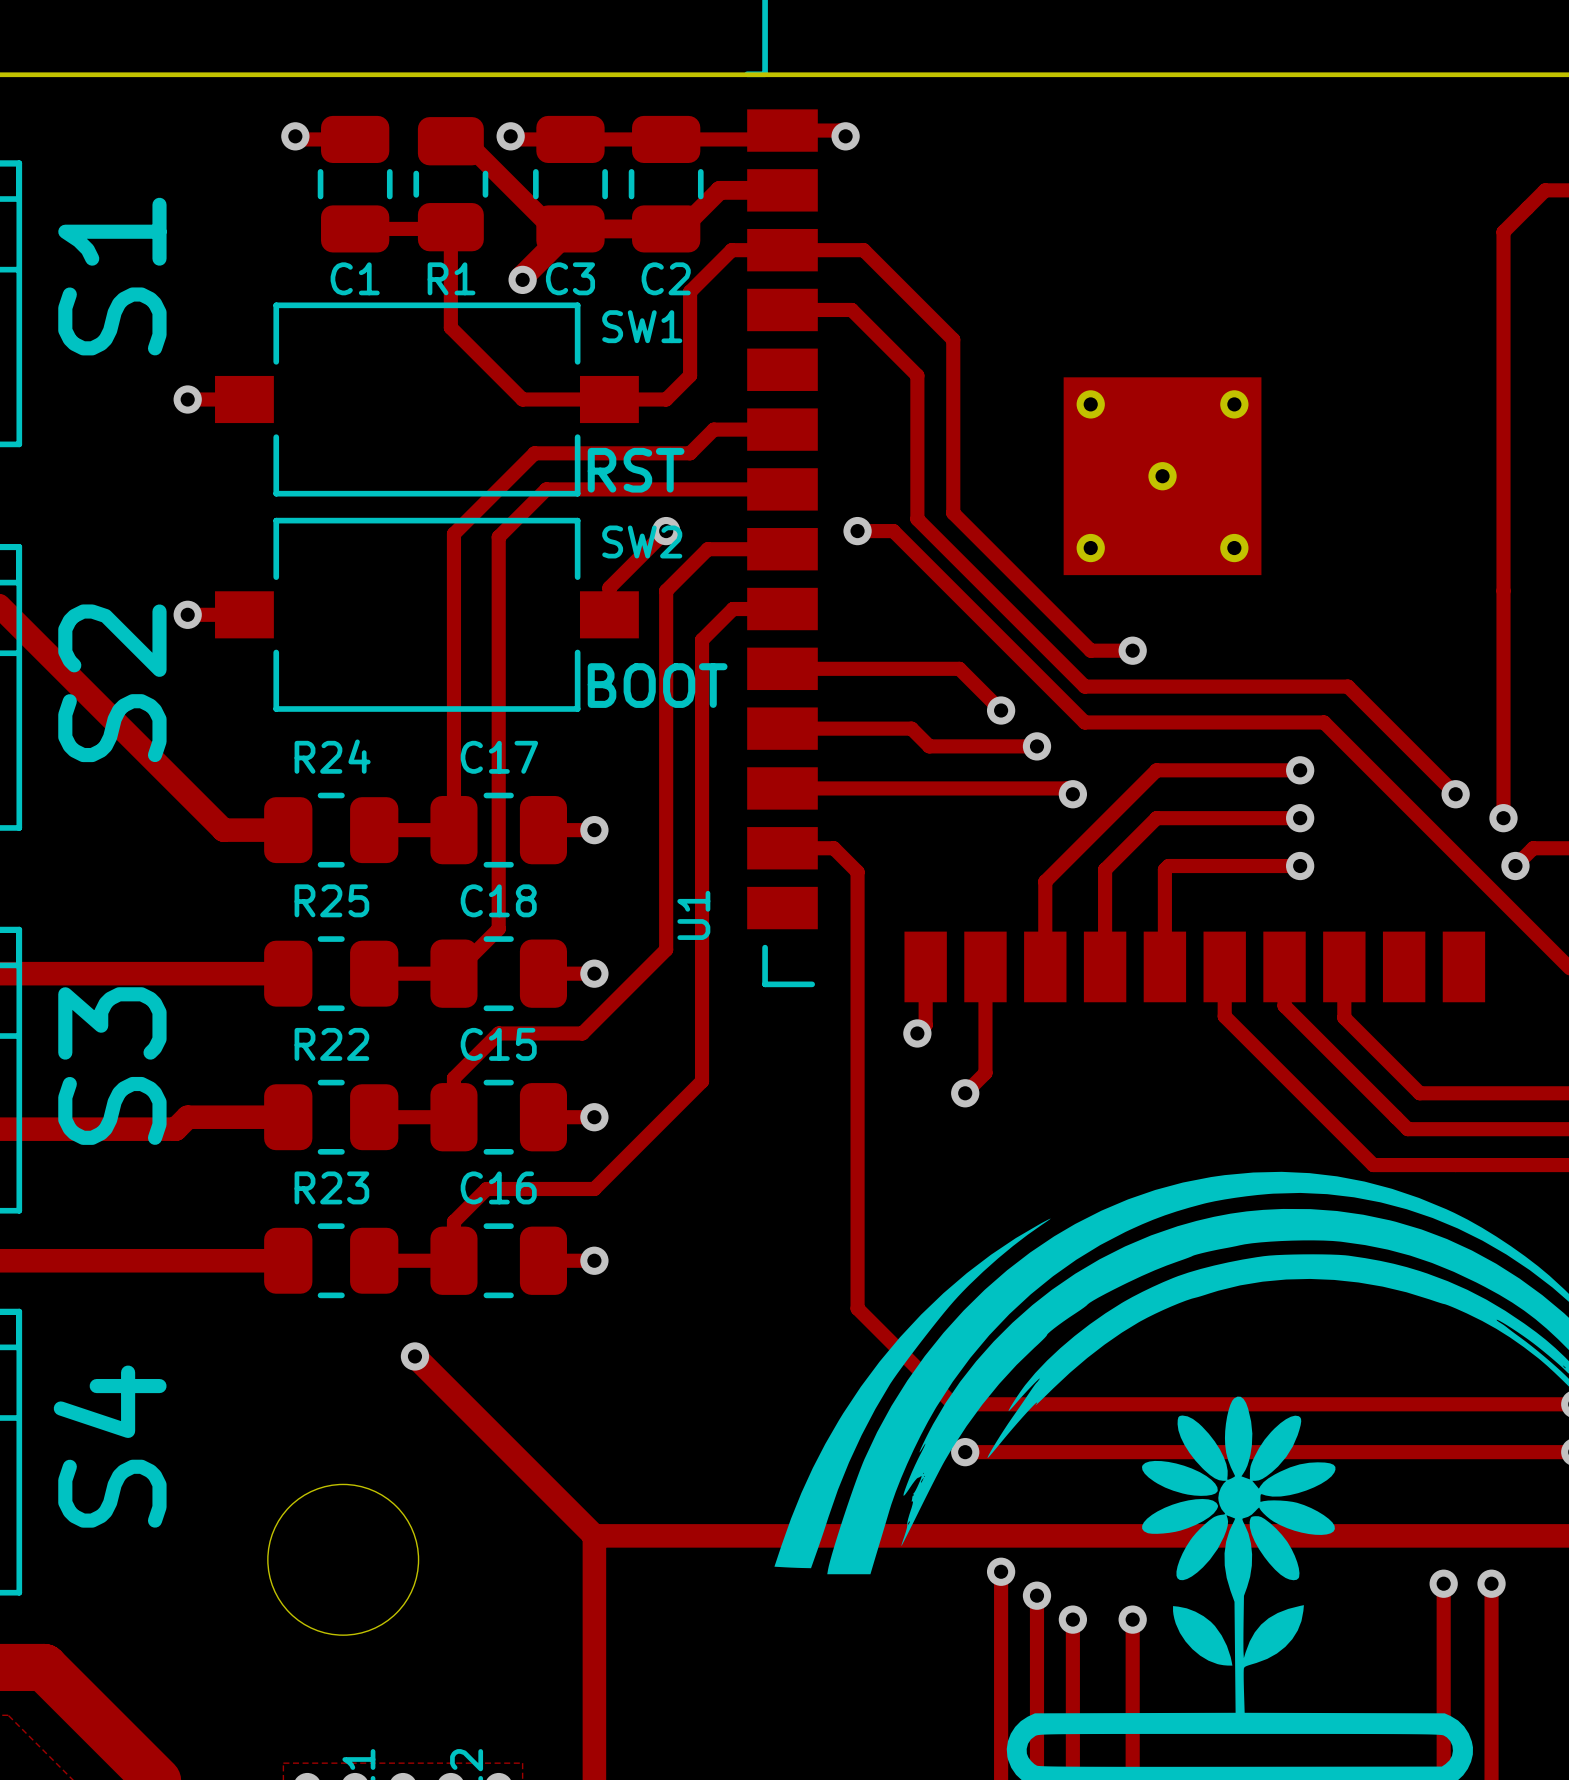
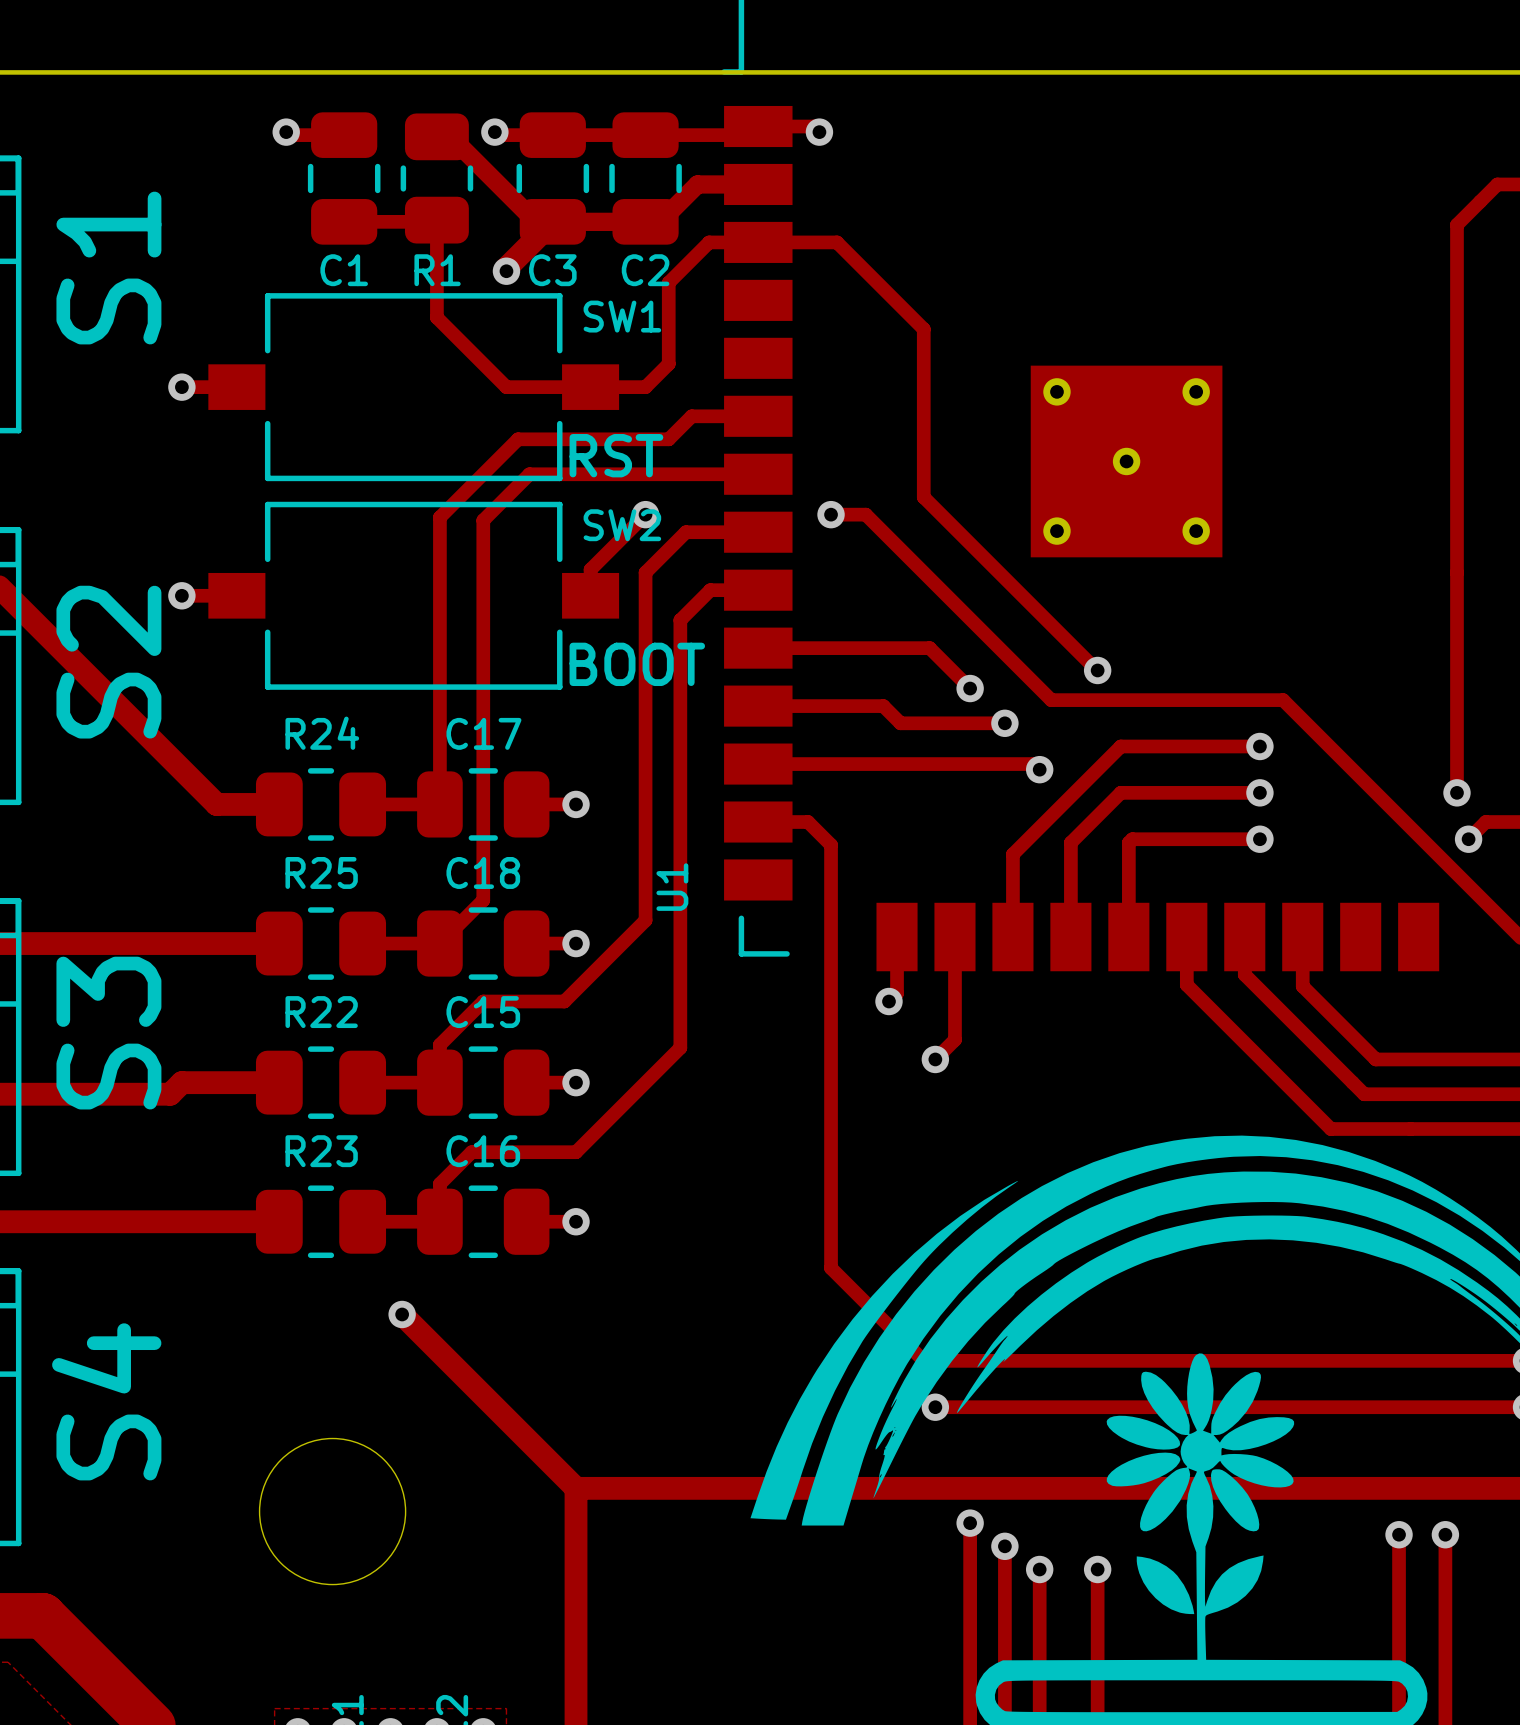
track: (782, 309) (851, 309) (917, 375) (917, 519) (1084, 686) (1348, 686) (1455, 794) -> none
track: (1090, 650) (1132, 650) -> (1057, 630) (1096, 670)
via position: (1132, 650) -> (1097, 670)
via: (1455, 794) -> none

